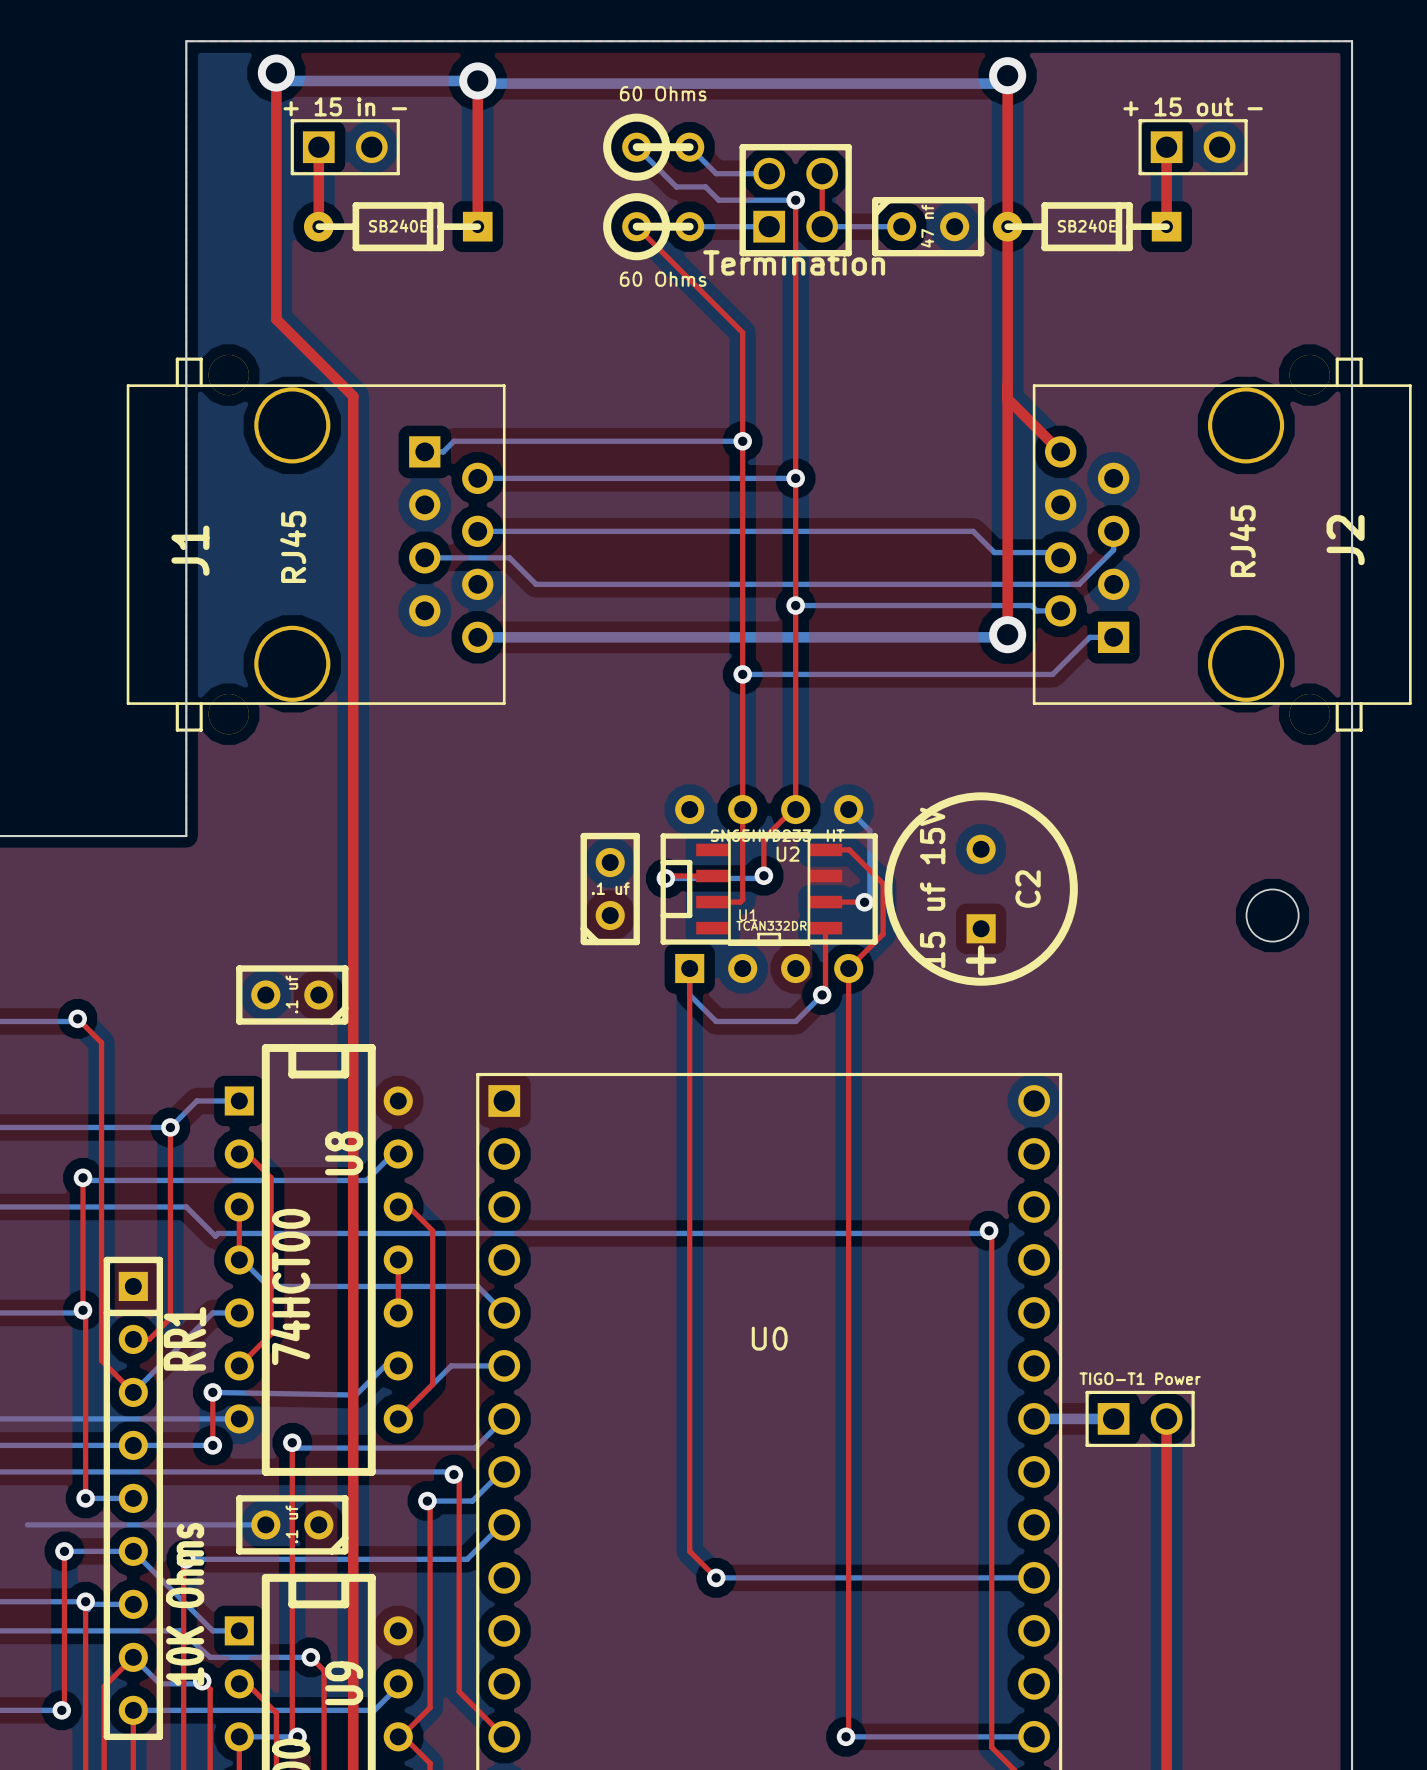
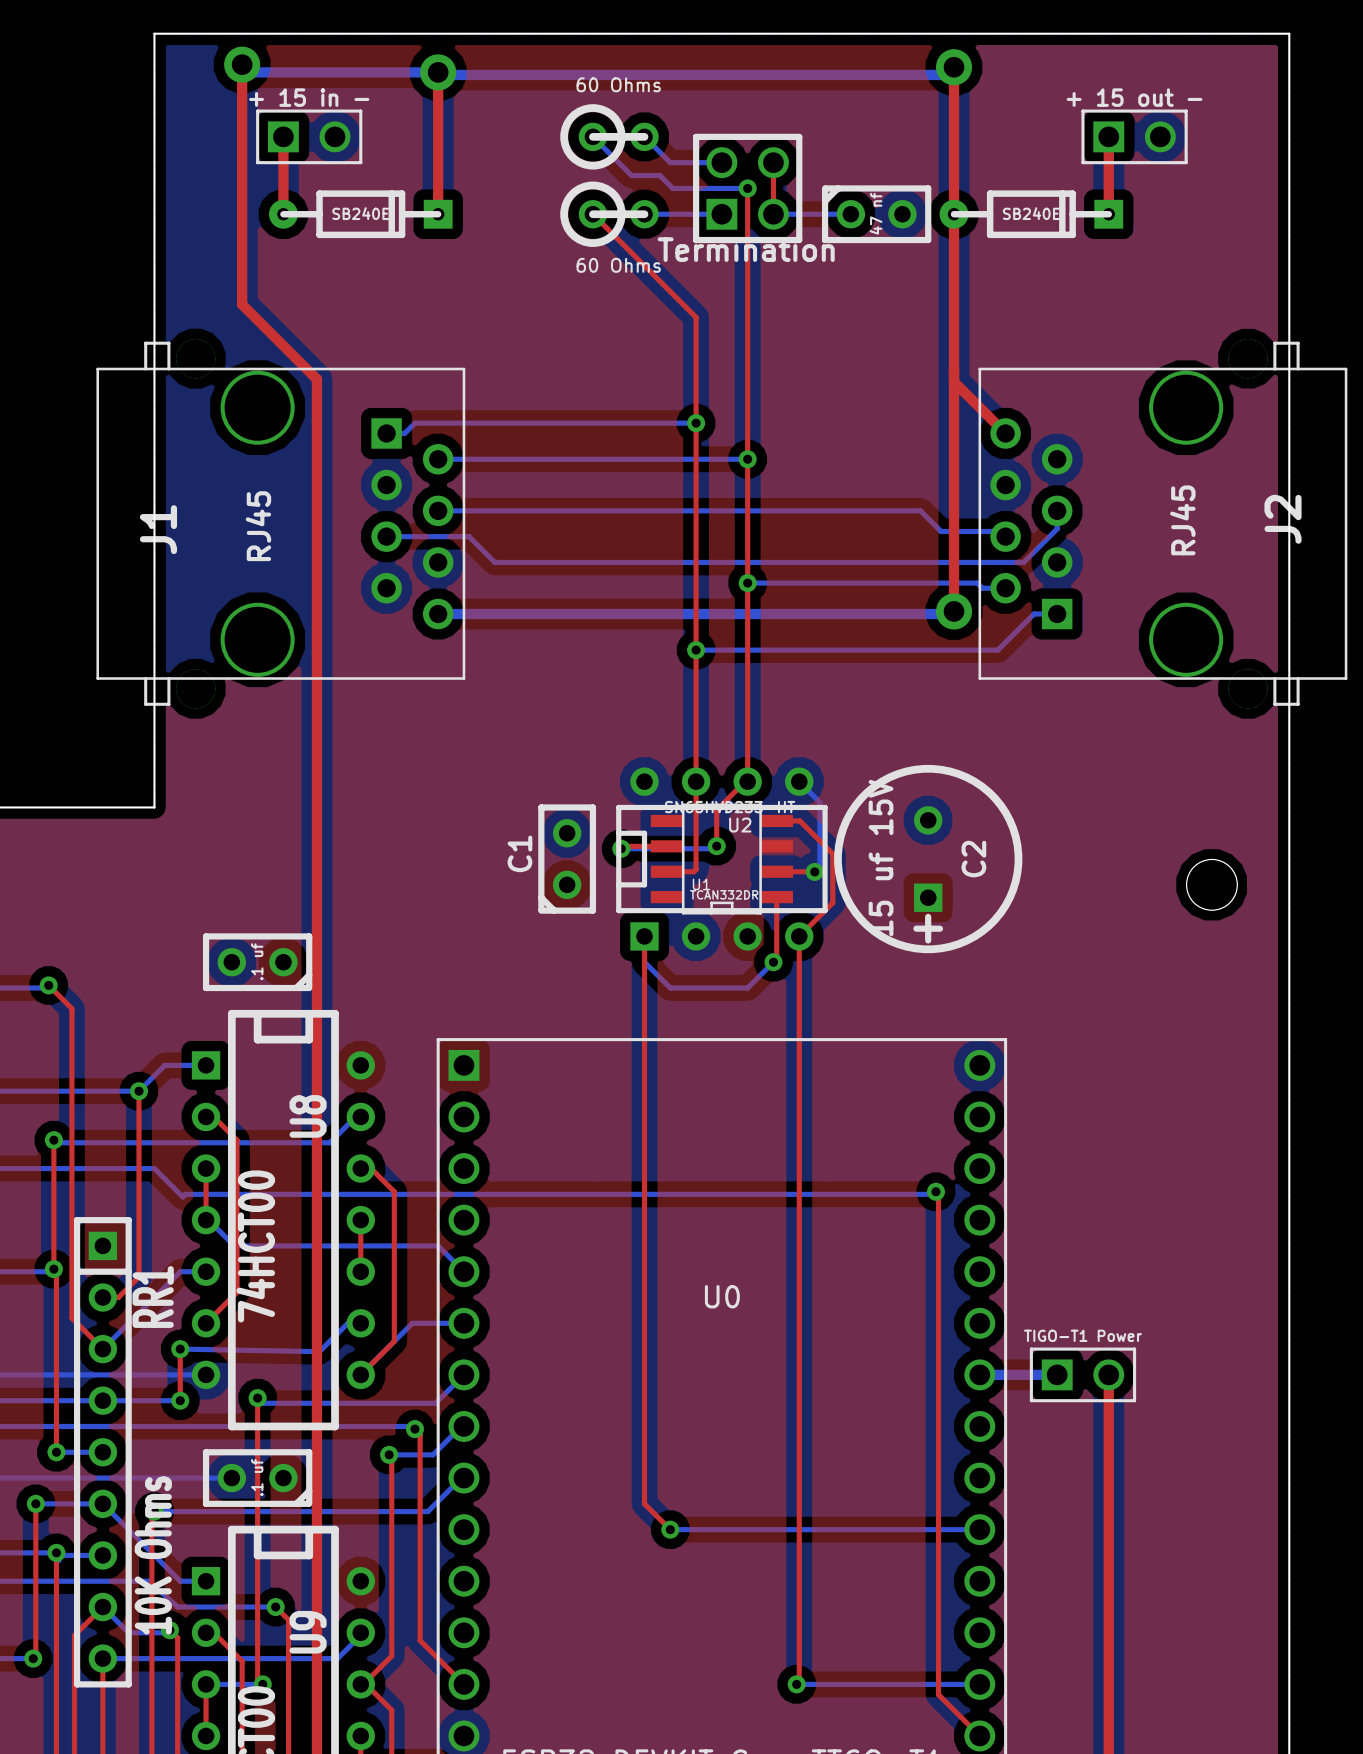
C1 name: none -> C1 (519, 853)
C1 value: .1 uf (610, 888) -> none

